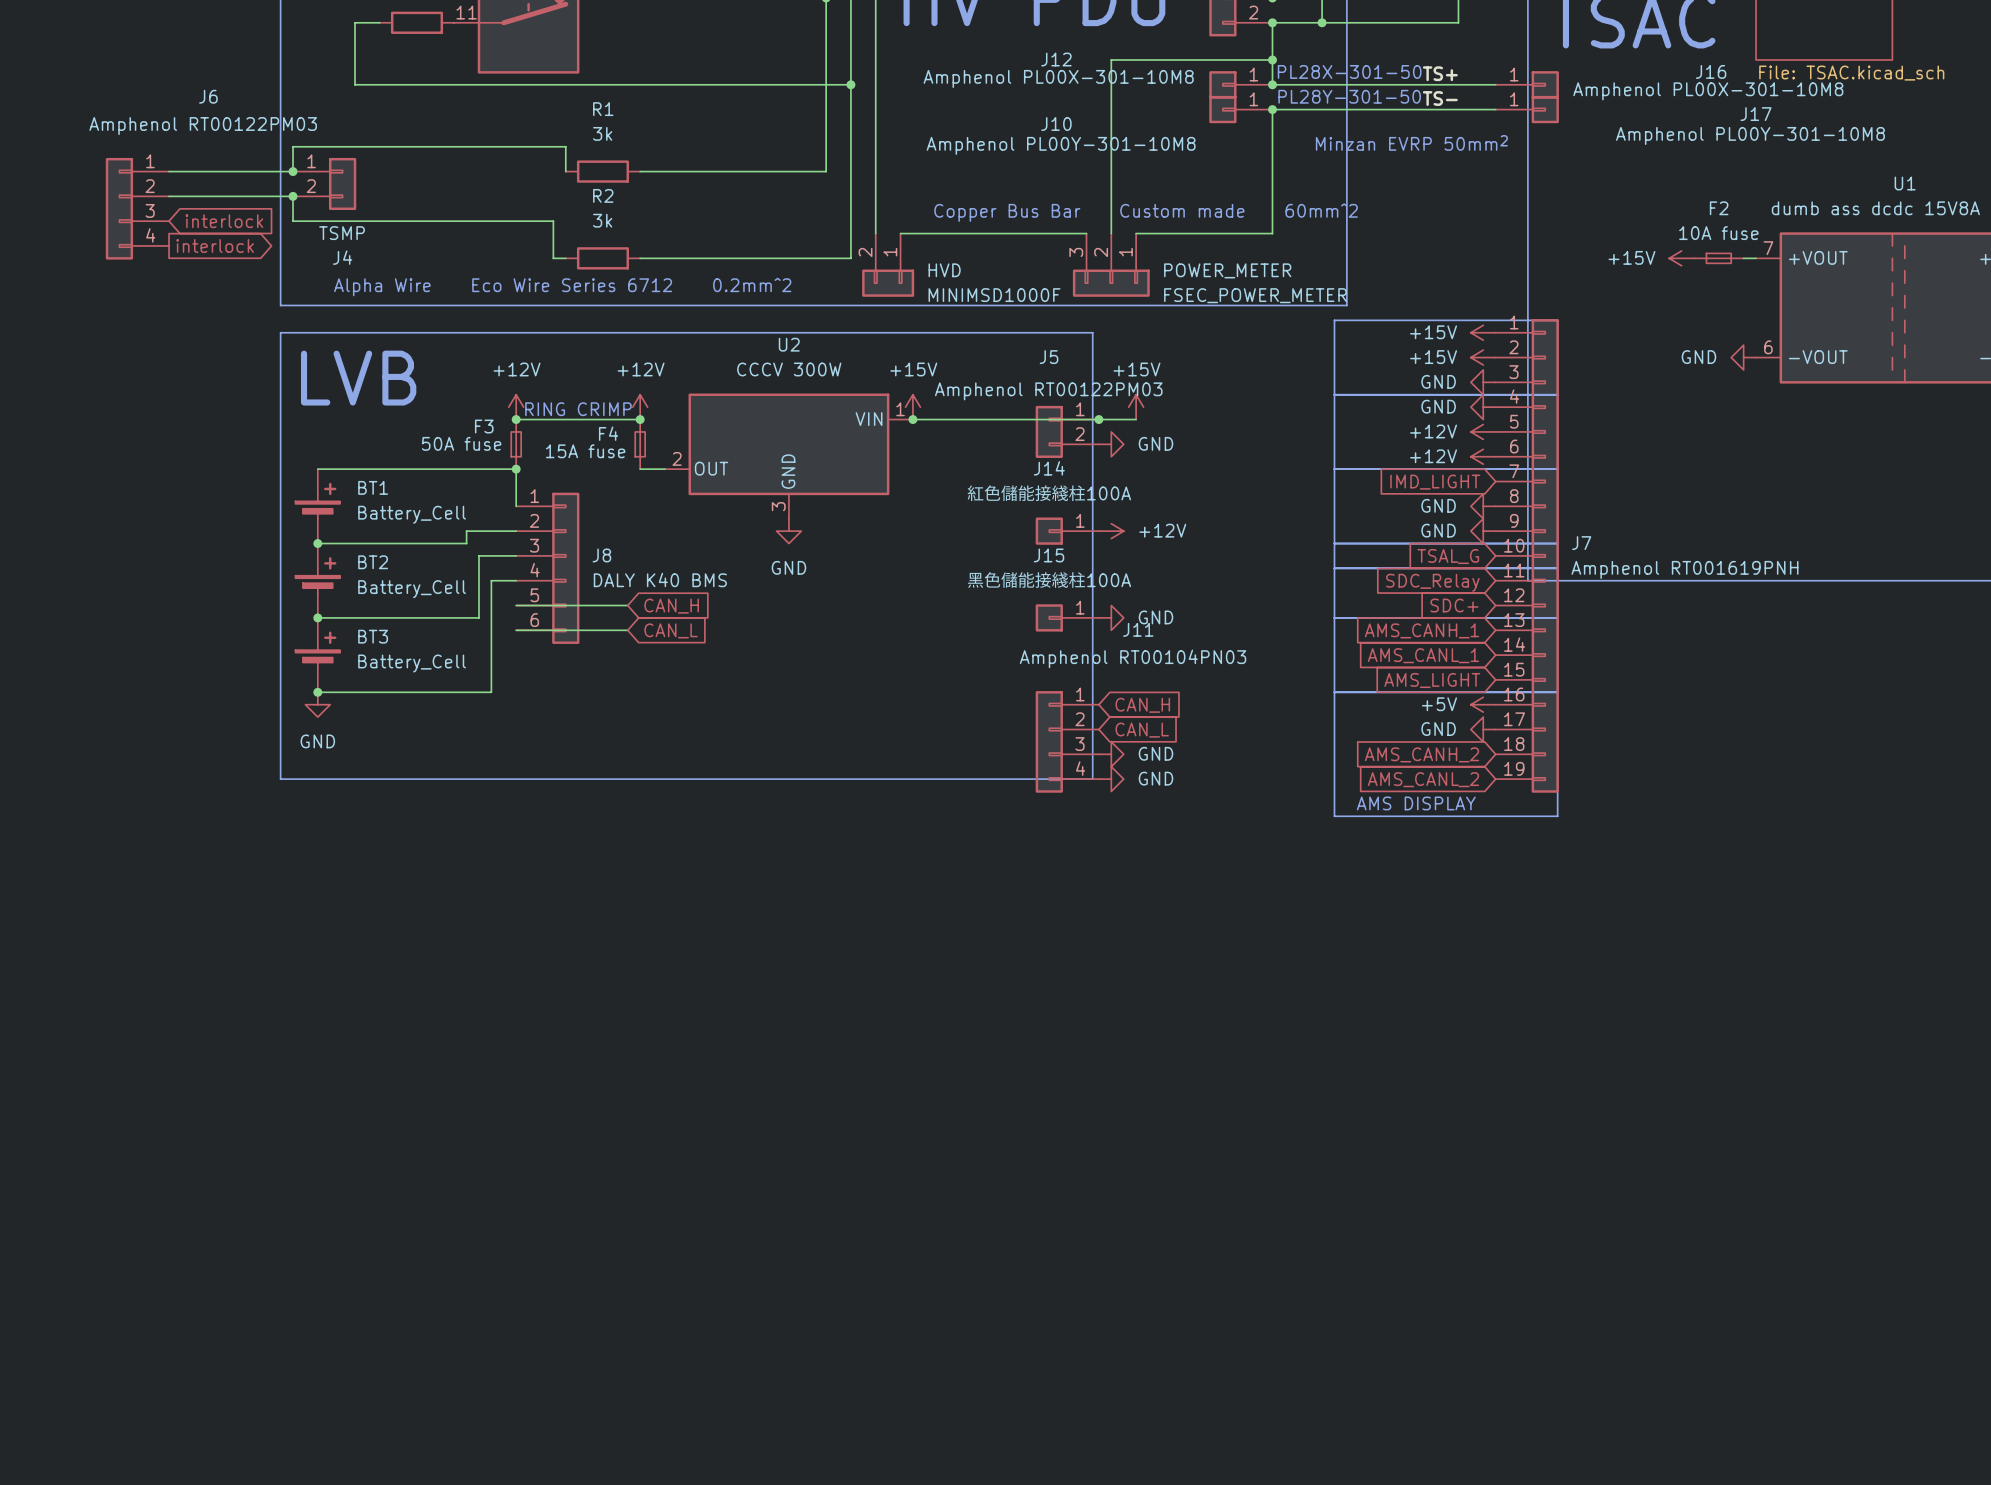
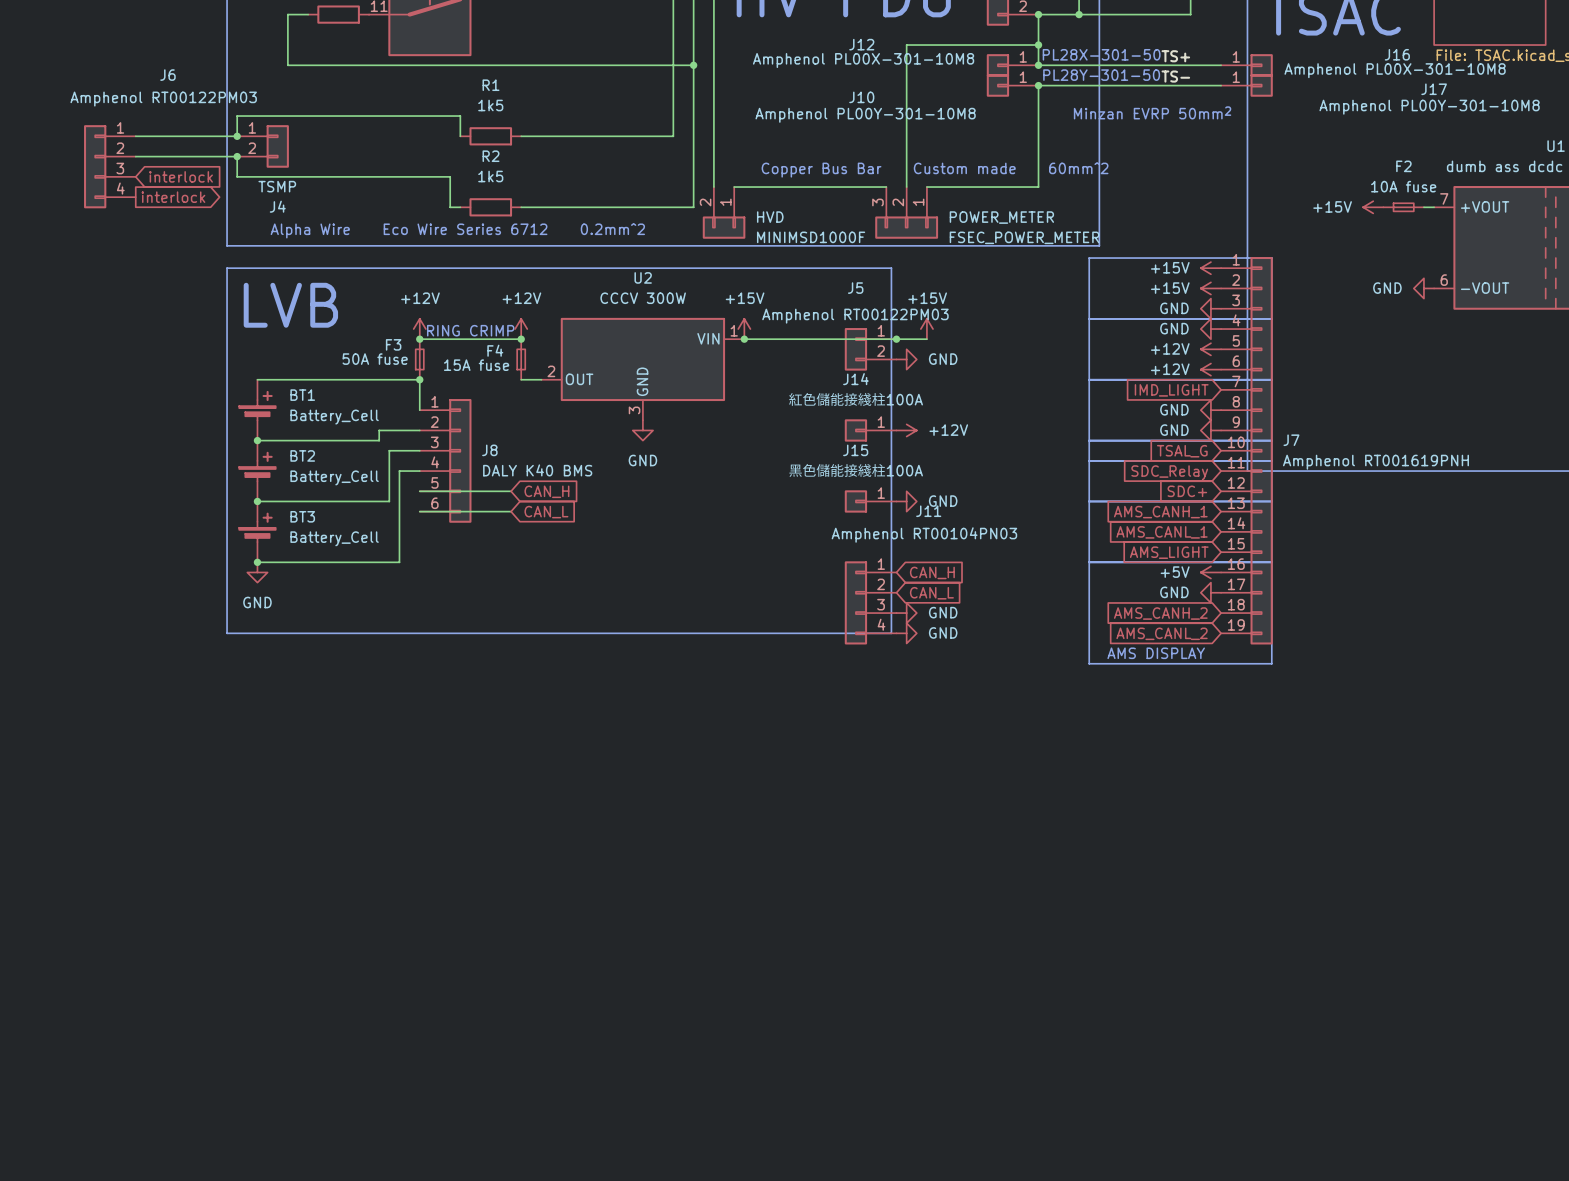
R1 value: 3k (602, 133) -> 1k5 (490, 105)
R2 value: 3k (602, 220) -> 1k5 (490, 176)

